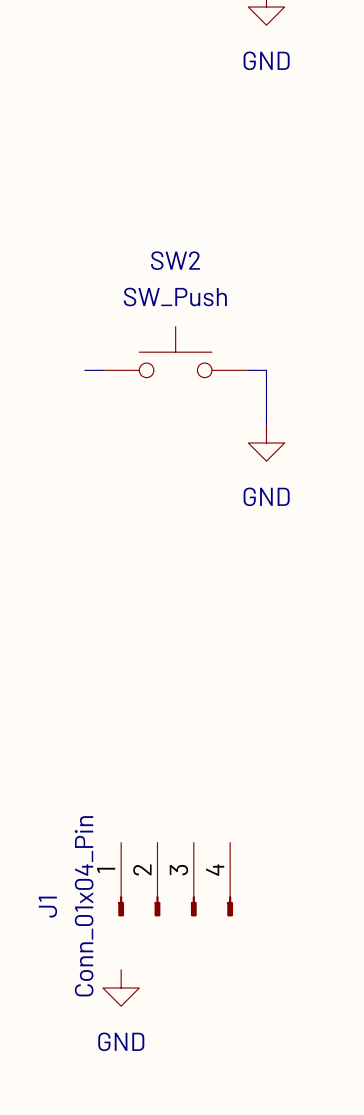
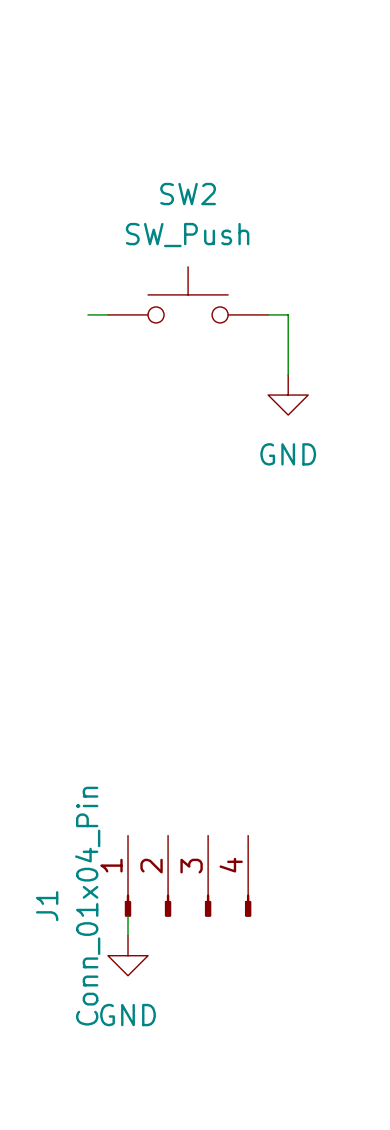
wire: none -> (128, 915) (128, 935)
power symbol position: GND (121, 988) -> GND (128, 955)

